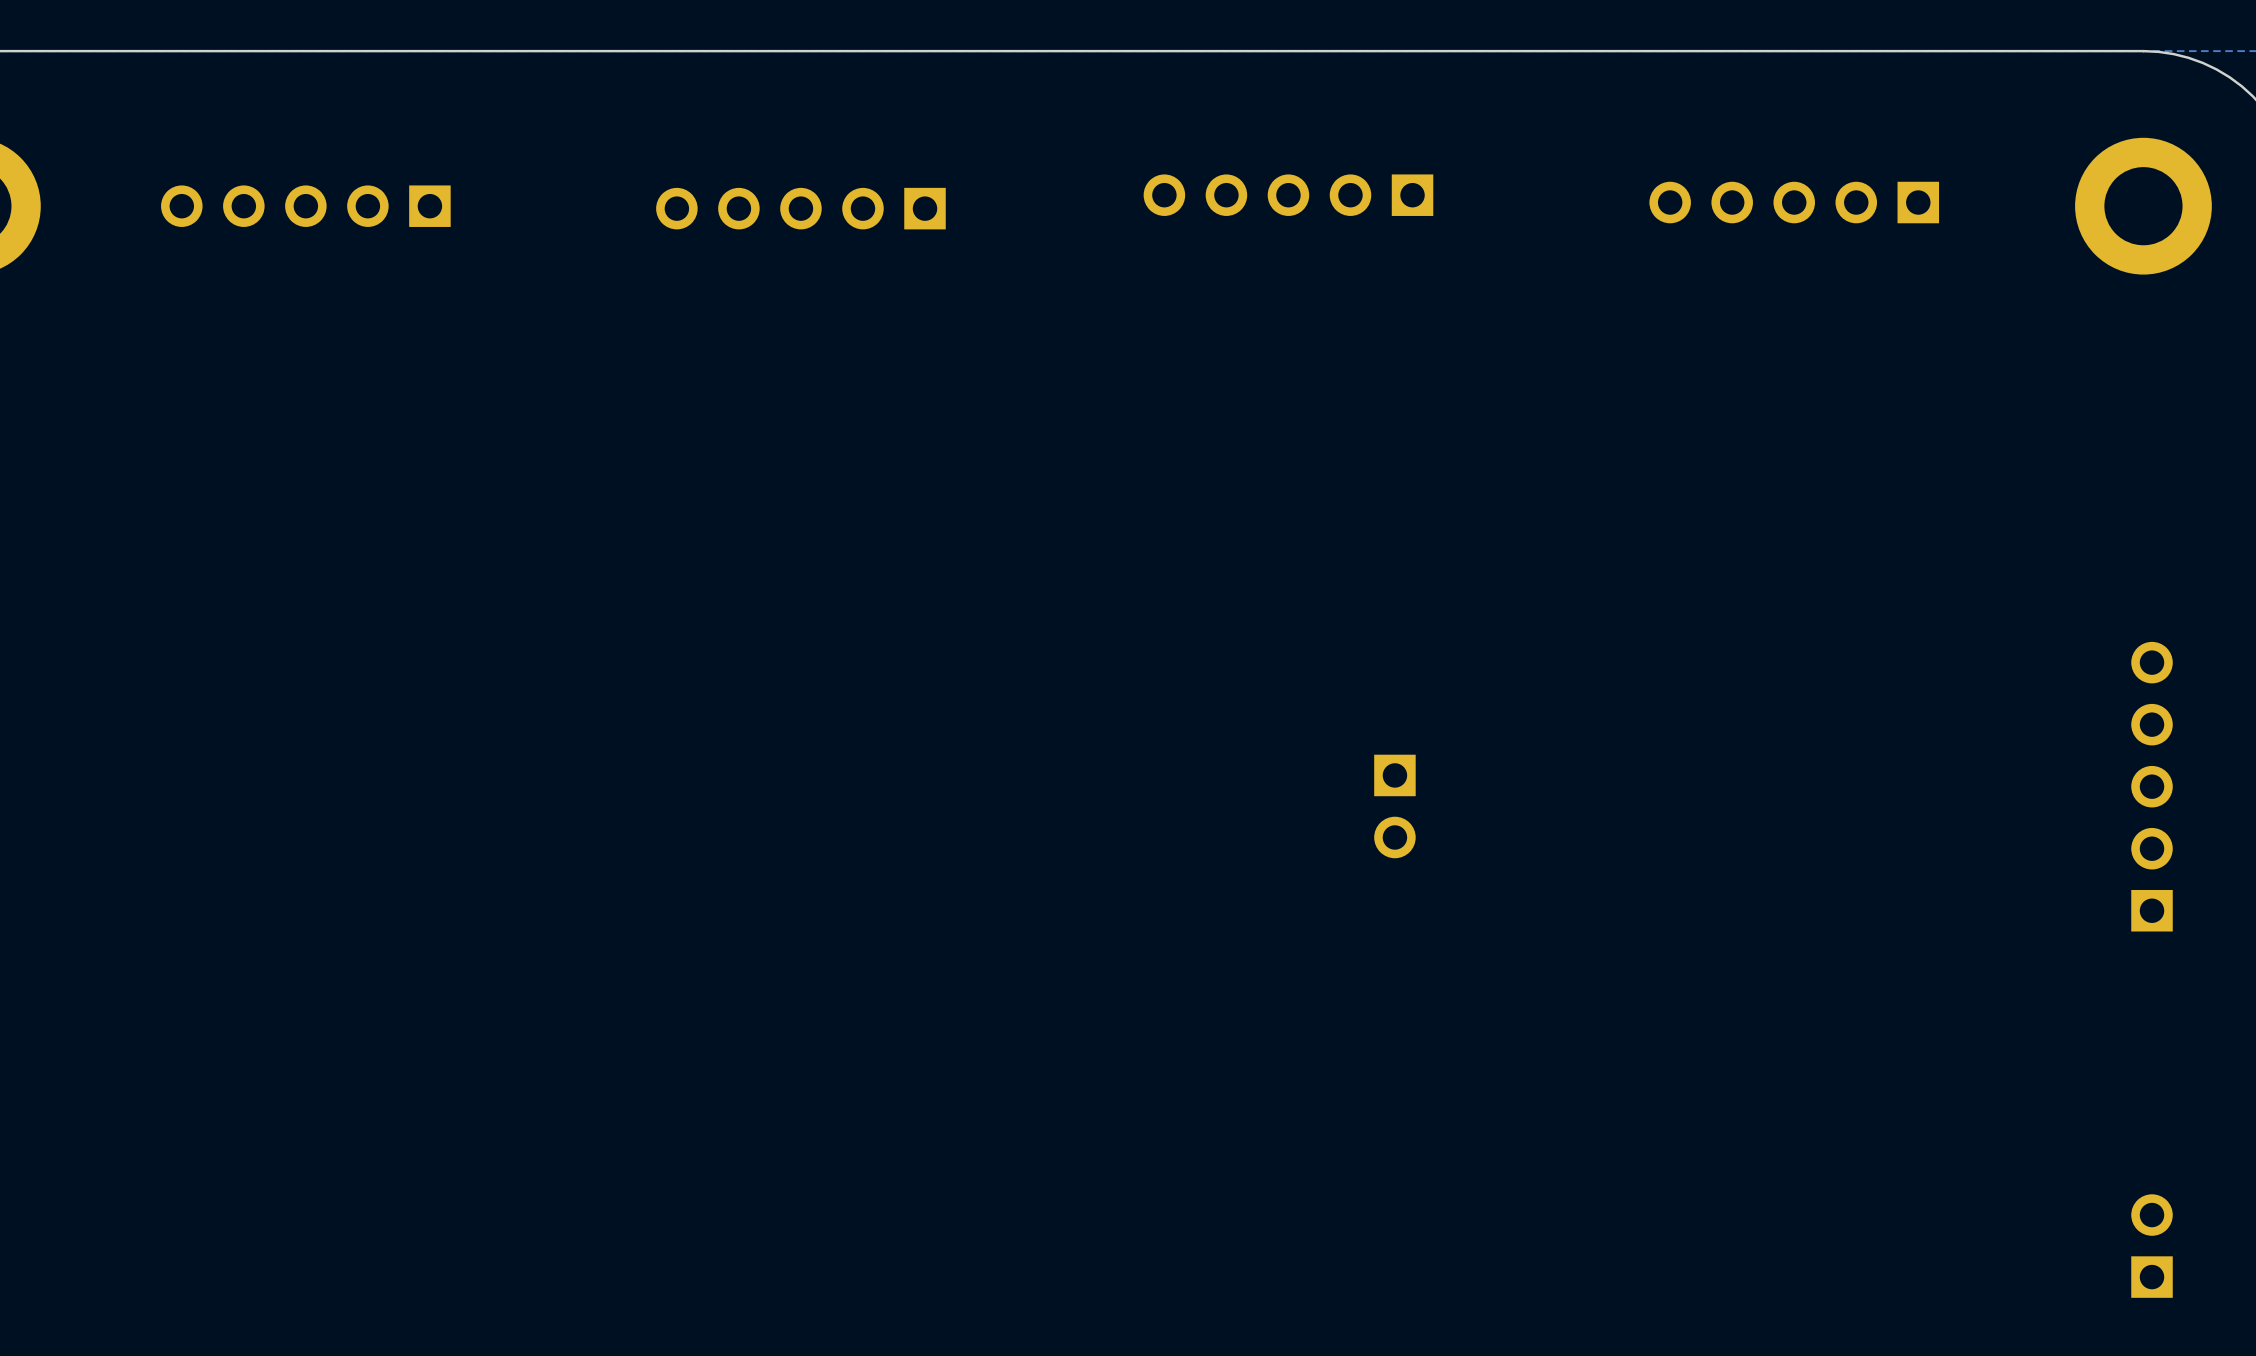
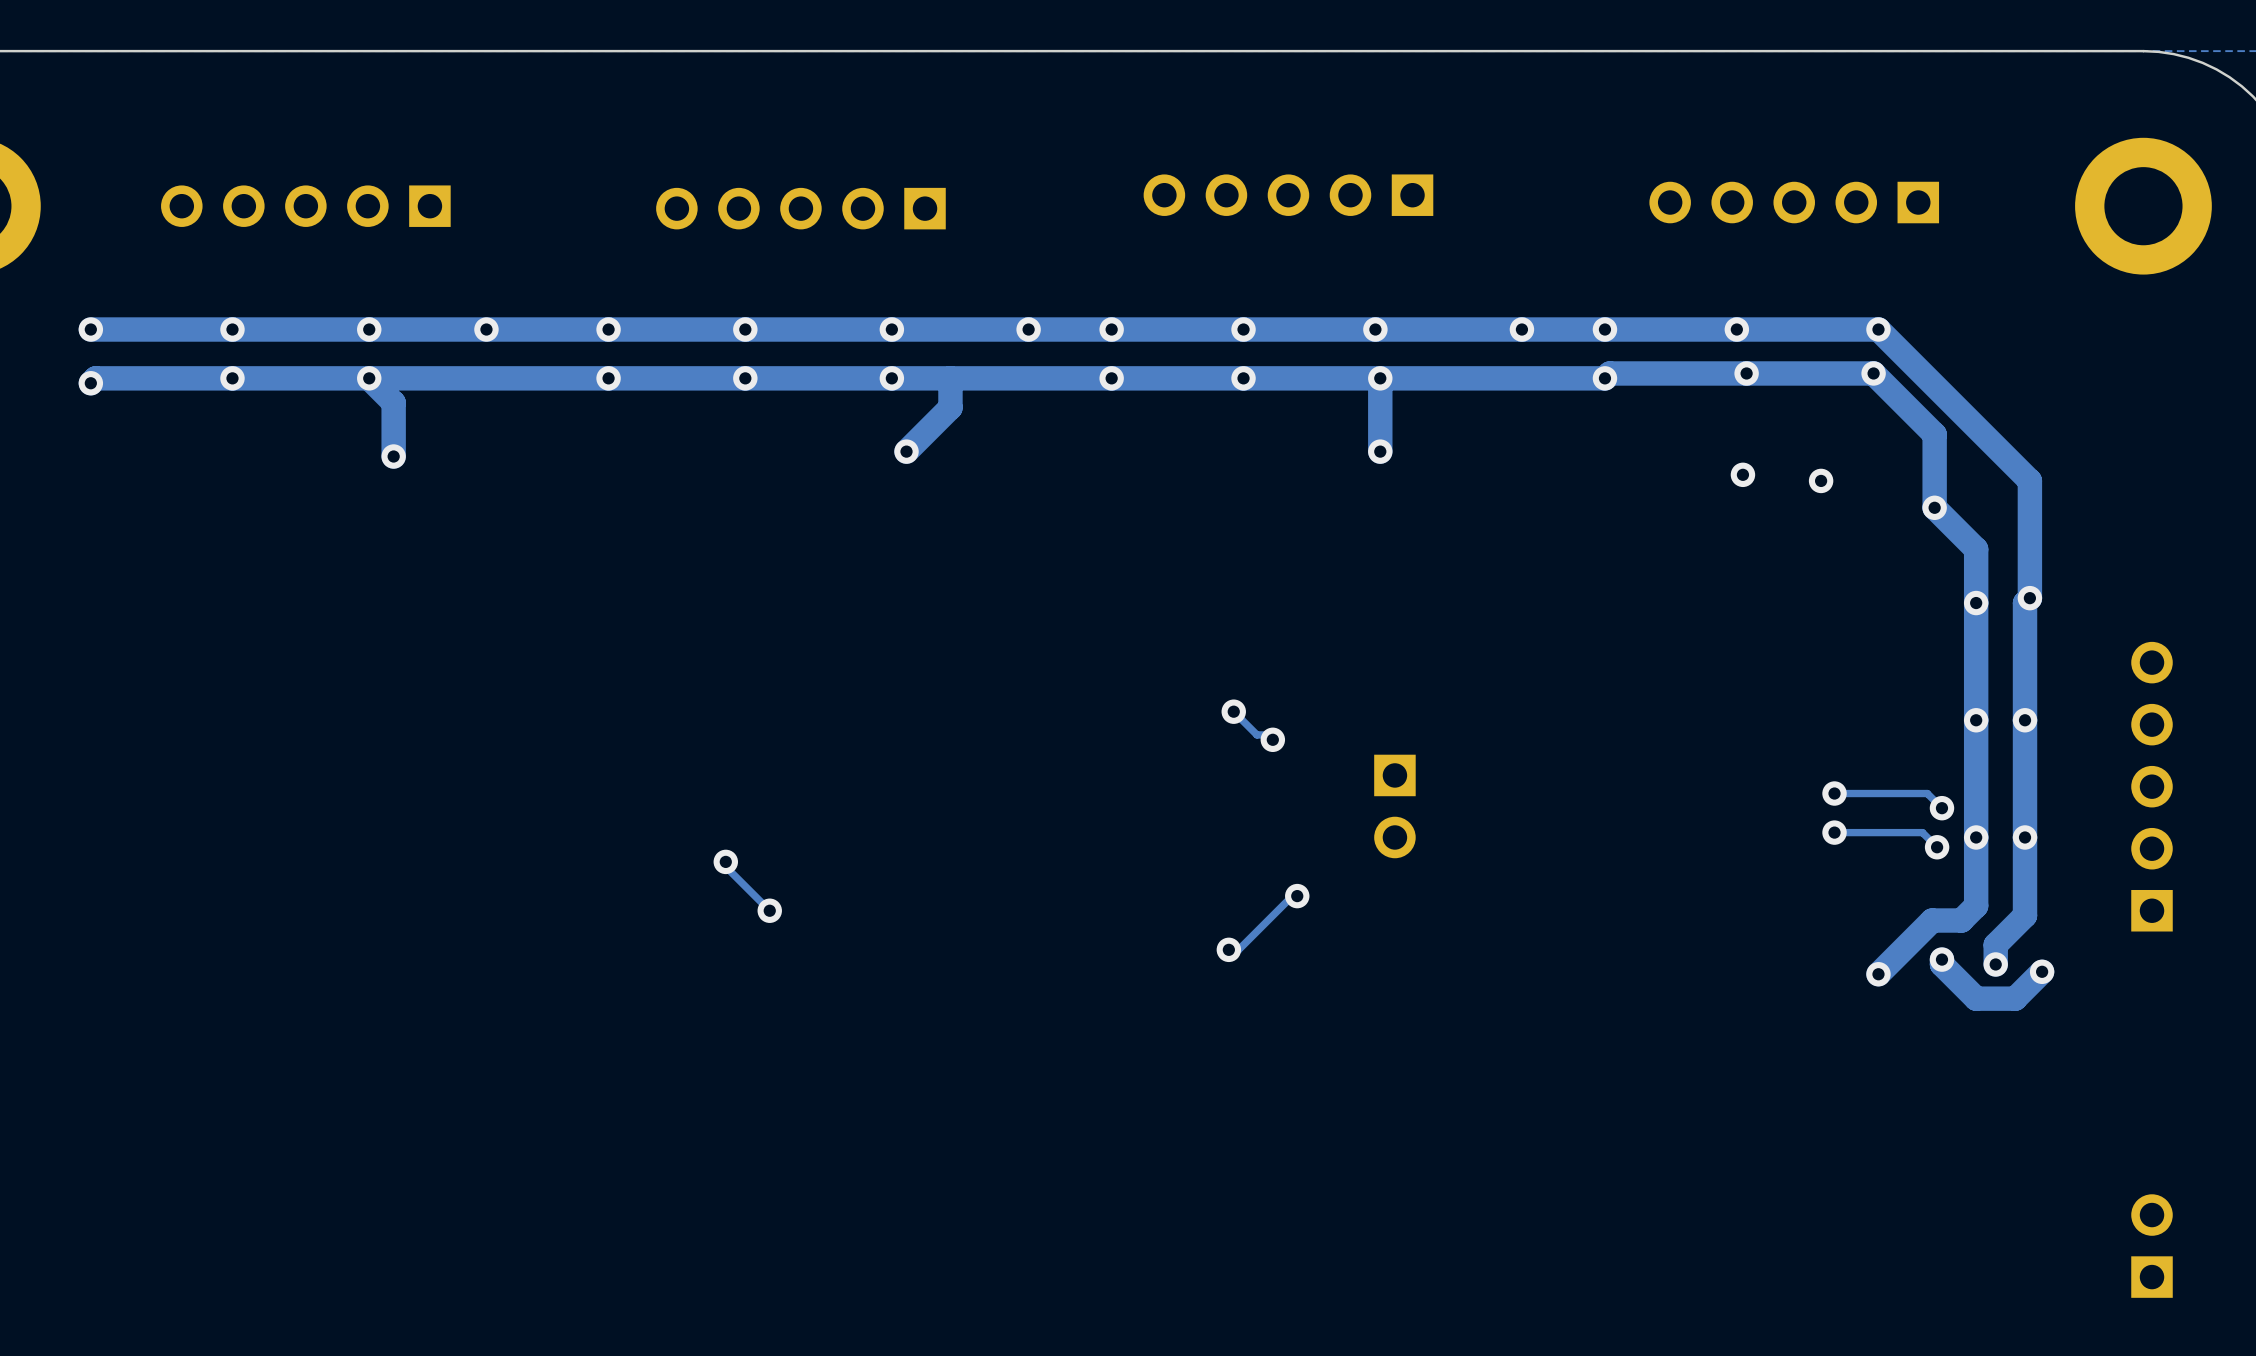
track: none -> (90, 329) (1878, 329) (2029, 480) (2029, 598) (2025, 603) (2025, 915) (1995, 944) (1995, 964)
via: none -> (90, 329)
via: none -> (232, 329)
via: none -> (369, 329)
via: none -> (486, 329)
via: none -> (608, 329)
via: none -> (745, 329)
via: none -> (891, 329)
via: none -> (1028, 329)
via: none -> (1111, 329)
via: none -> (1243, 329)
via: none -> (1375, 329)
via: none -> (1521, 329)
via: none -> (1604, 329)
via: none -> (1736, 329)
via: none -> (1878, 329)
via: none -> (1746, 373)
via: none -> (1873, 373)
via: none -> (232, 378)
track: none -> (369, 378) (393, 402) (393, 456)
via: none -> (369, 378)
via: none -> (608, 378)
via: none -> (745, 378)
via: none -> (891, 378)
track: none -> (950, 378) (950, 407) (906, 451)
via: none -> (1111, 378)
via: none -> (1243, 378)
track: none -> (1380, 378) (1380, 451)
via: none -> (1380, 378)
via: none -> (1604, 378)
track: none -> (90, 383) (95, 378) (1604, 378) (1609, 373) (1873, 373) (1934, 434) (1934, 507) (1976, 549) (1976, 905) (1961, 920) (1932, 920) (1878, 974)
via: none -> (90, 383)
via: none -> (906, 451)
via: none -> (1380, 451)
via: none -> (393, 456)
via: none -> (1742, 474)
via: none -> (1821, 480)
via: none -> (1934, 507)
via: none -> (2029, 598)
via: none -> (1976, 603)
track: none -> (1233, 711) (1256, 734) (1267, 734) (1272, 739)
via: none -> (1233, 711)
via: none -> (1976, 720)
via: none -> (2025, 720)
via: none -> (1272, 739)
track: none -> (1834, 793) (1927, 793) (1941, 808)
via: none -> (1834, 793)
via: none -> (1941, 808)
track: none -> (1834, 832) (1922, 832) (1937, 847)
via: none -> (1834, 832)
via: none -> (1976, 837)
via: none -> (2025, 837)
via: none -> (1937, 847)
track: none -> (725, 861) (725, 866) (769, 910)
via: none -> (725, 861)
track: none -> (1297, 896) (1292, 896) (1238, 949) (1228, 949)
via: none -> (1297, 896)
via: none -> (769, 910)
via: none -> (1228, 949)
track: none -> (1941, 959) (1941, 964) (1976, 998) (2015, 998) (2042, 971)
via: none -> (1941, 959)
via: none -> (1995, 964)
via: none -> (2042, 971)
via: none -> (1878, 974)

